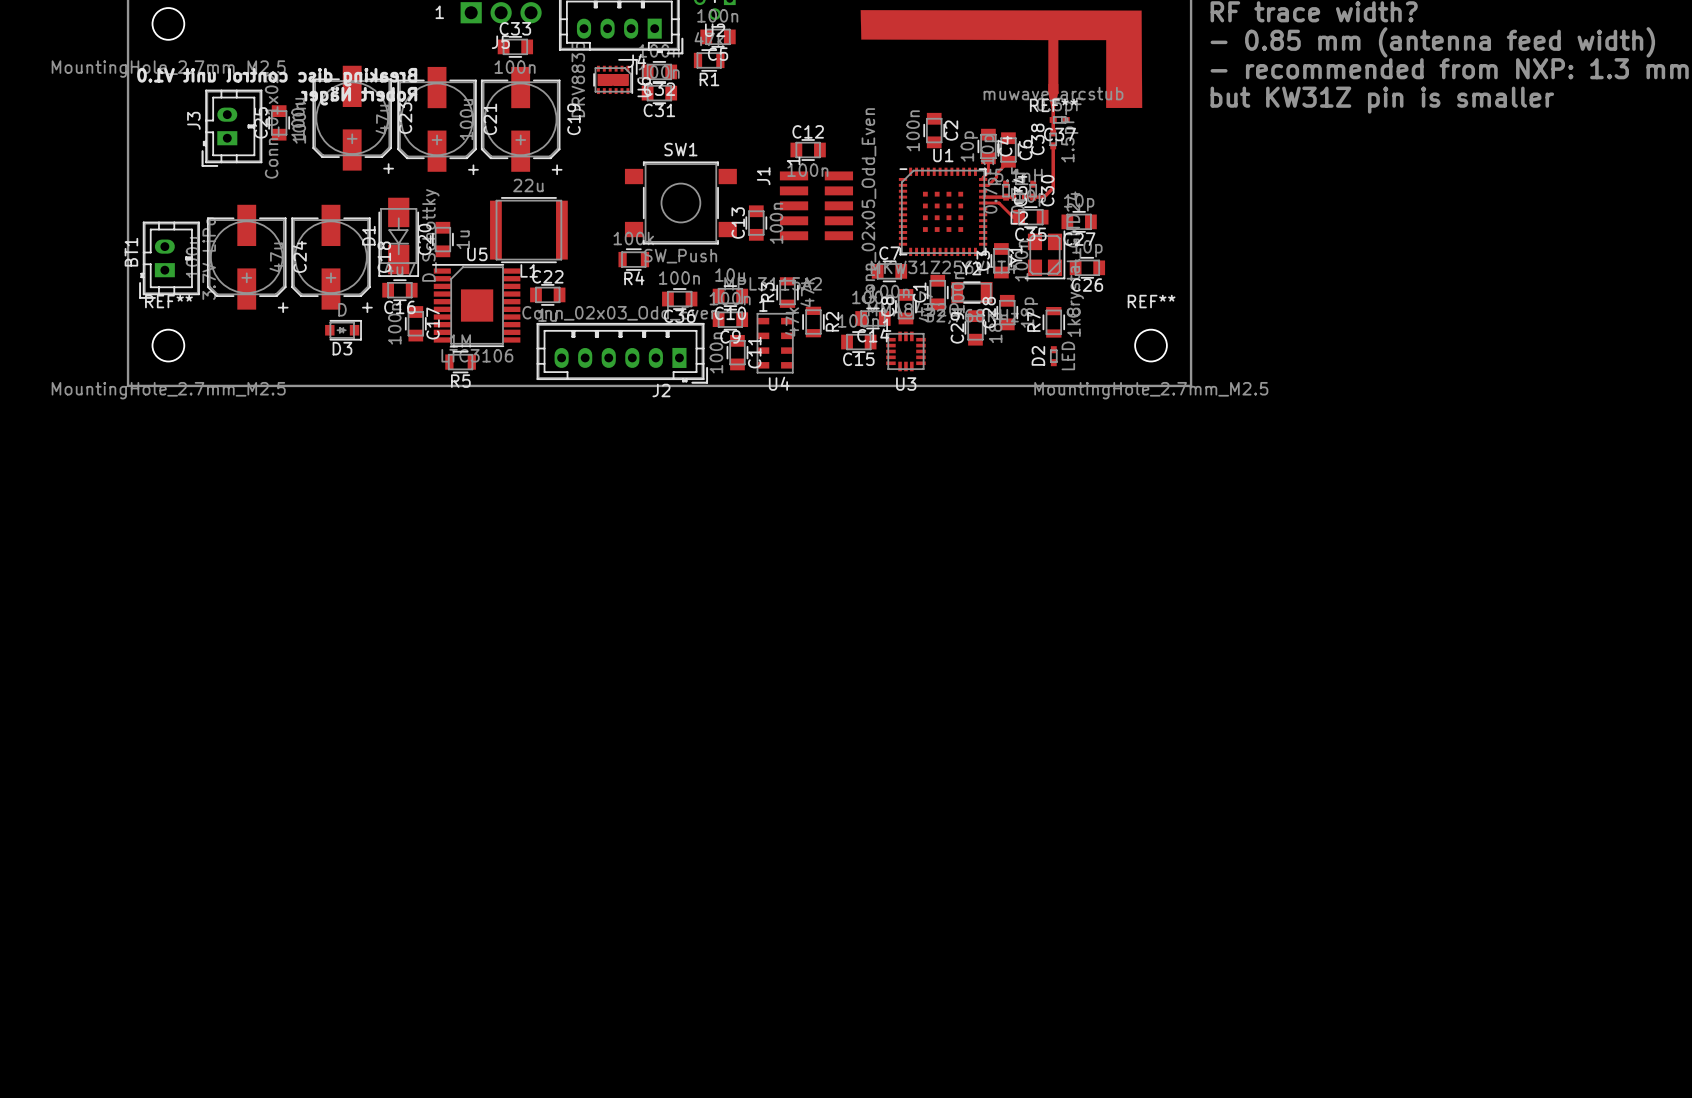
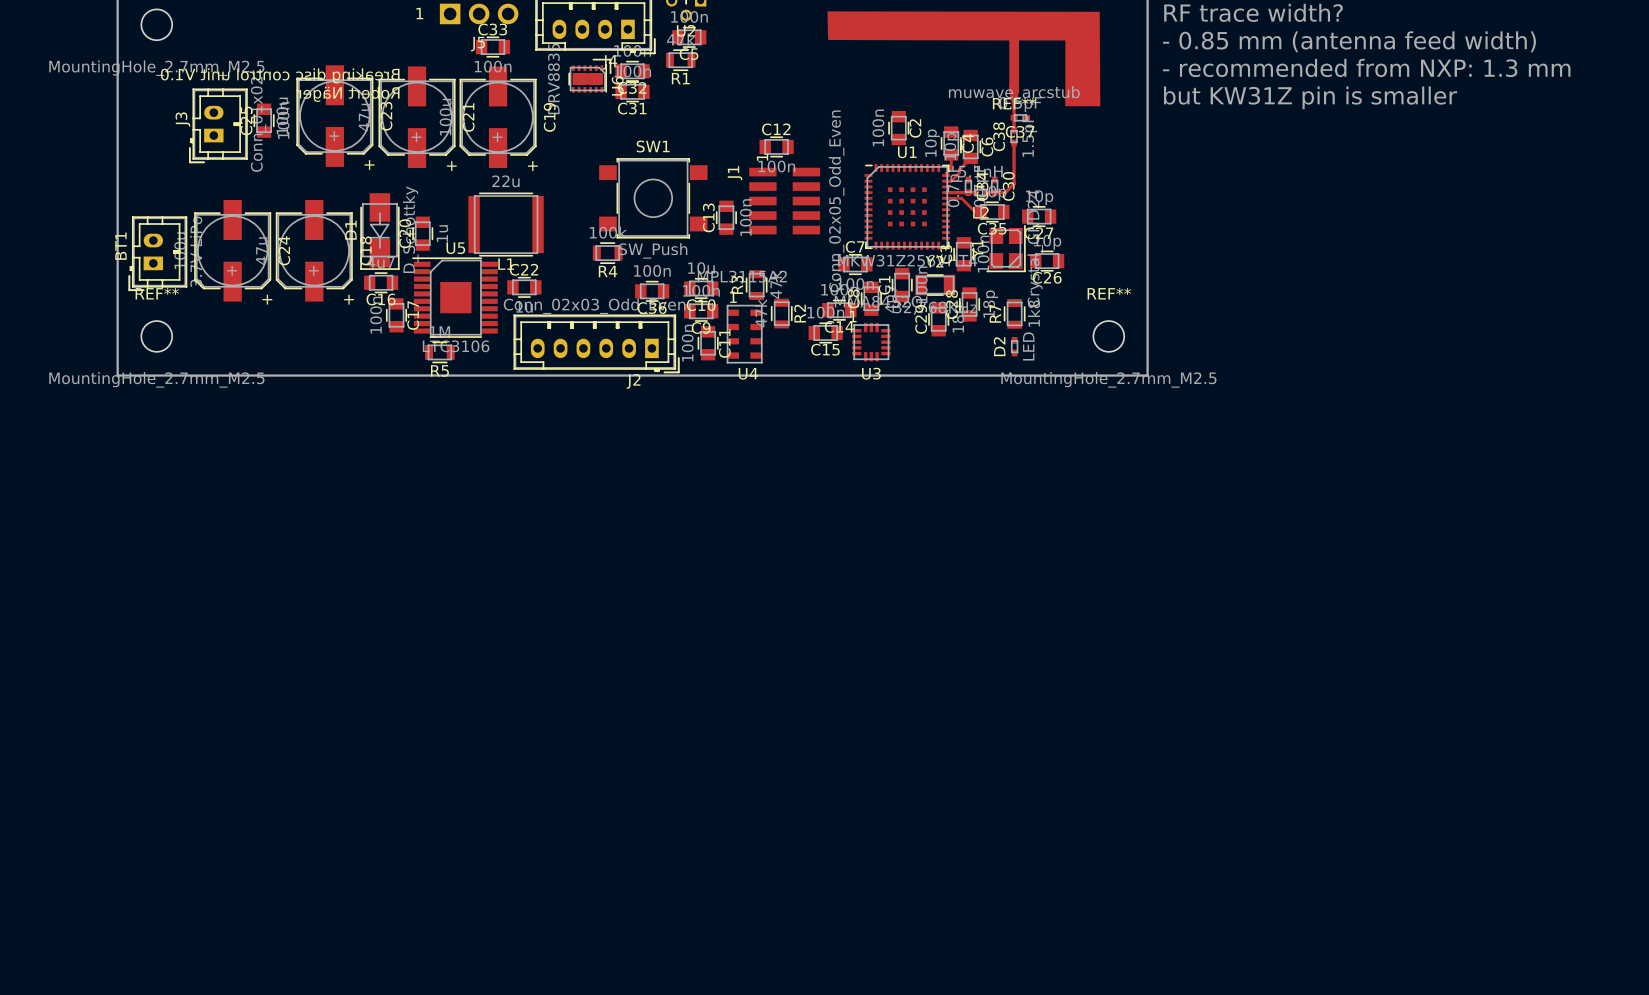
D3: D (343, 330) -> none

